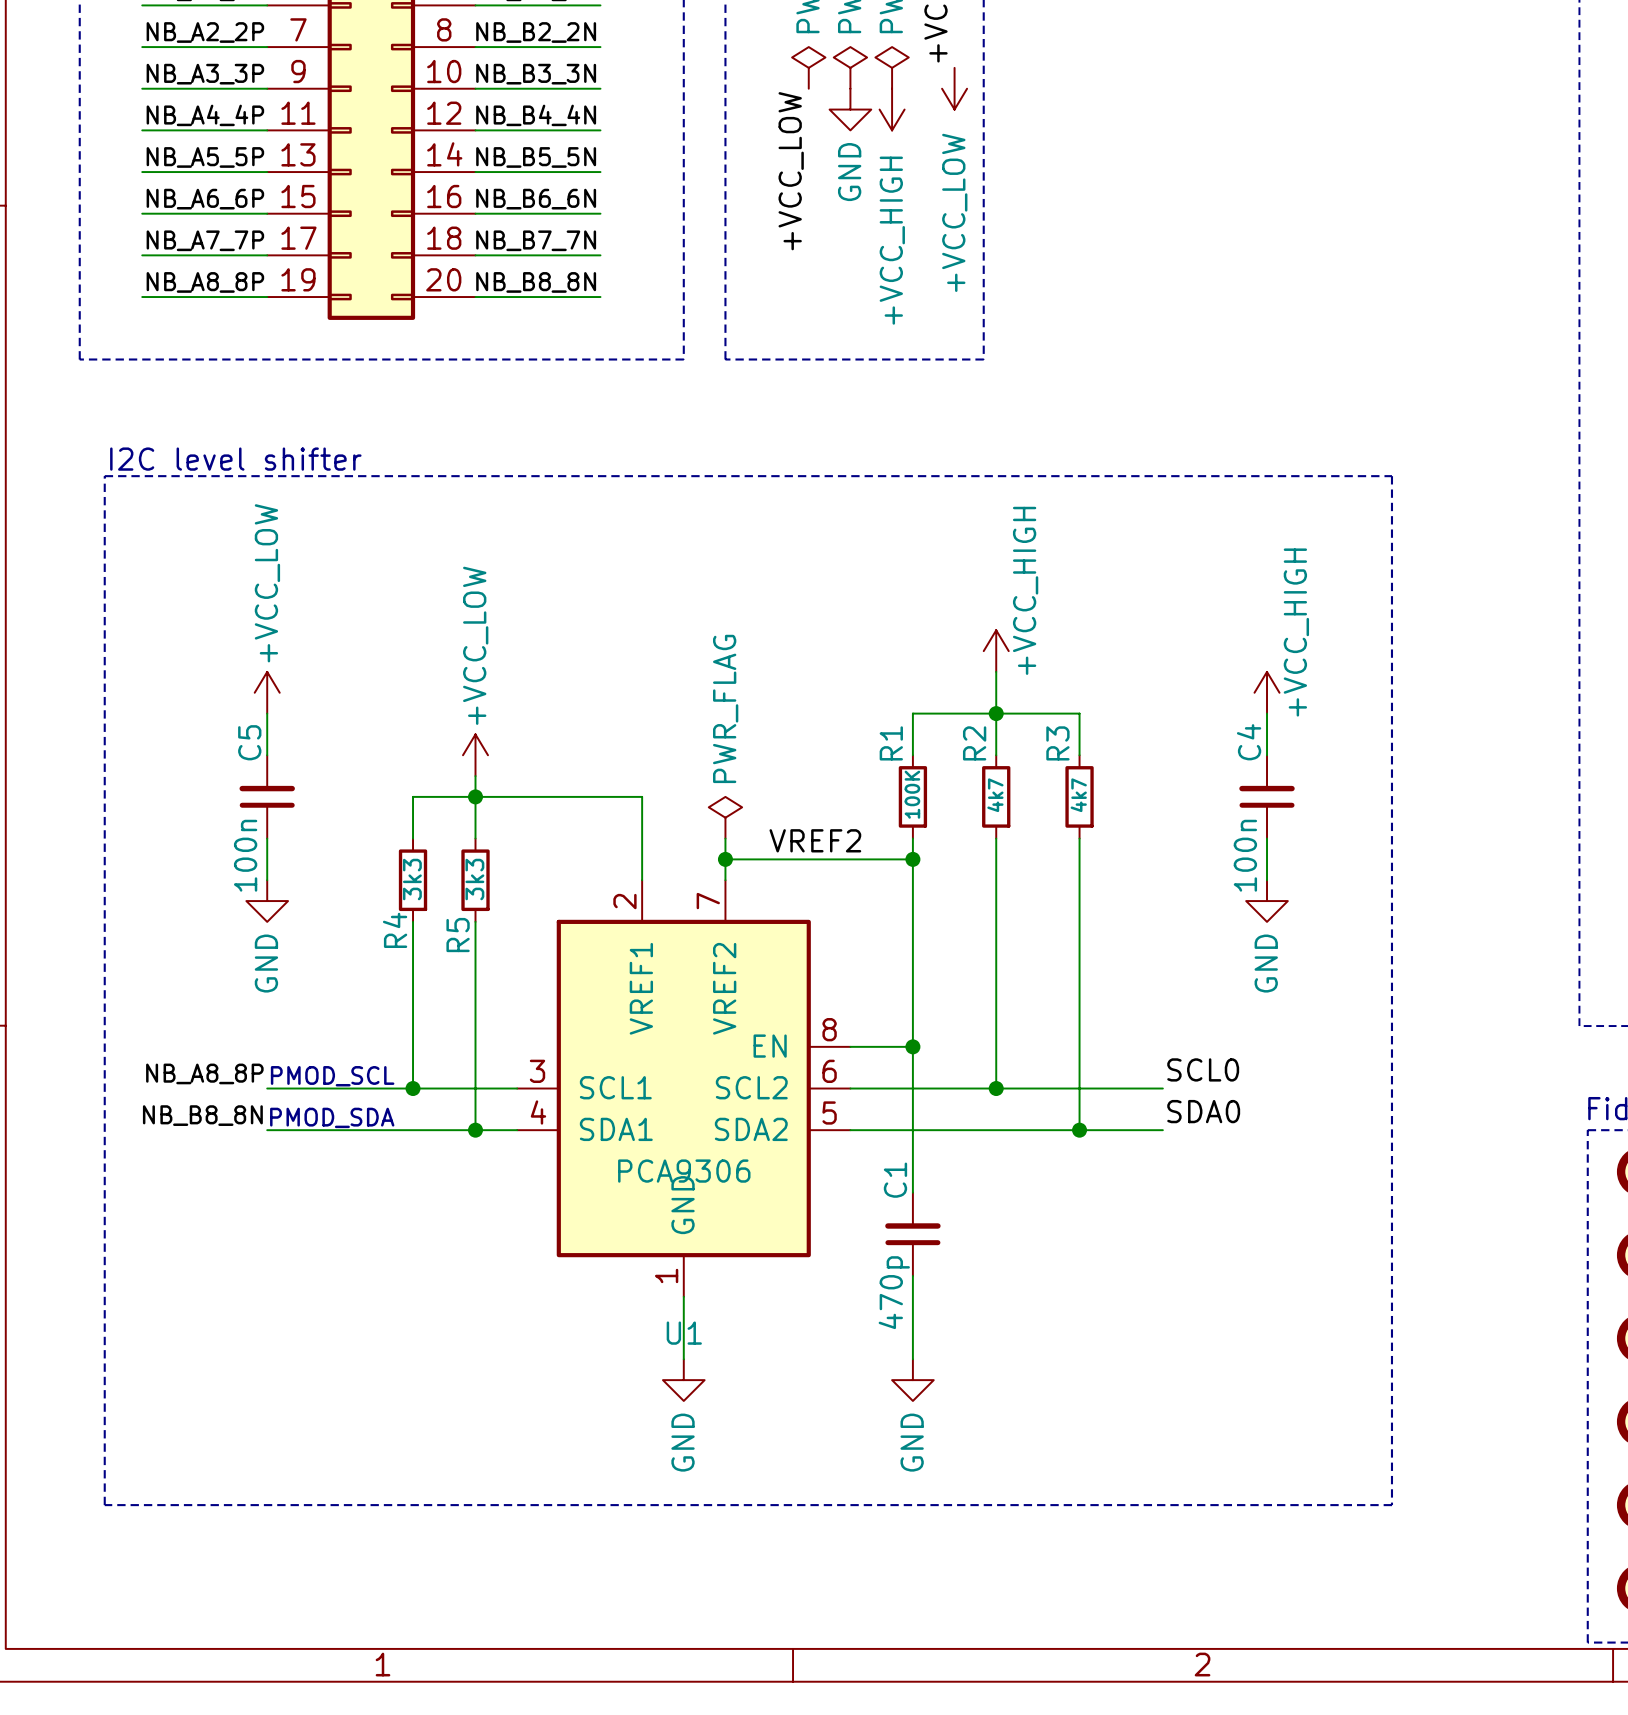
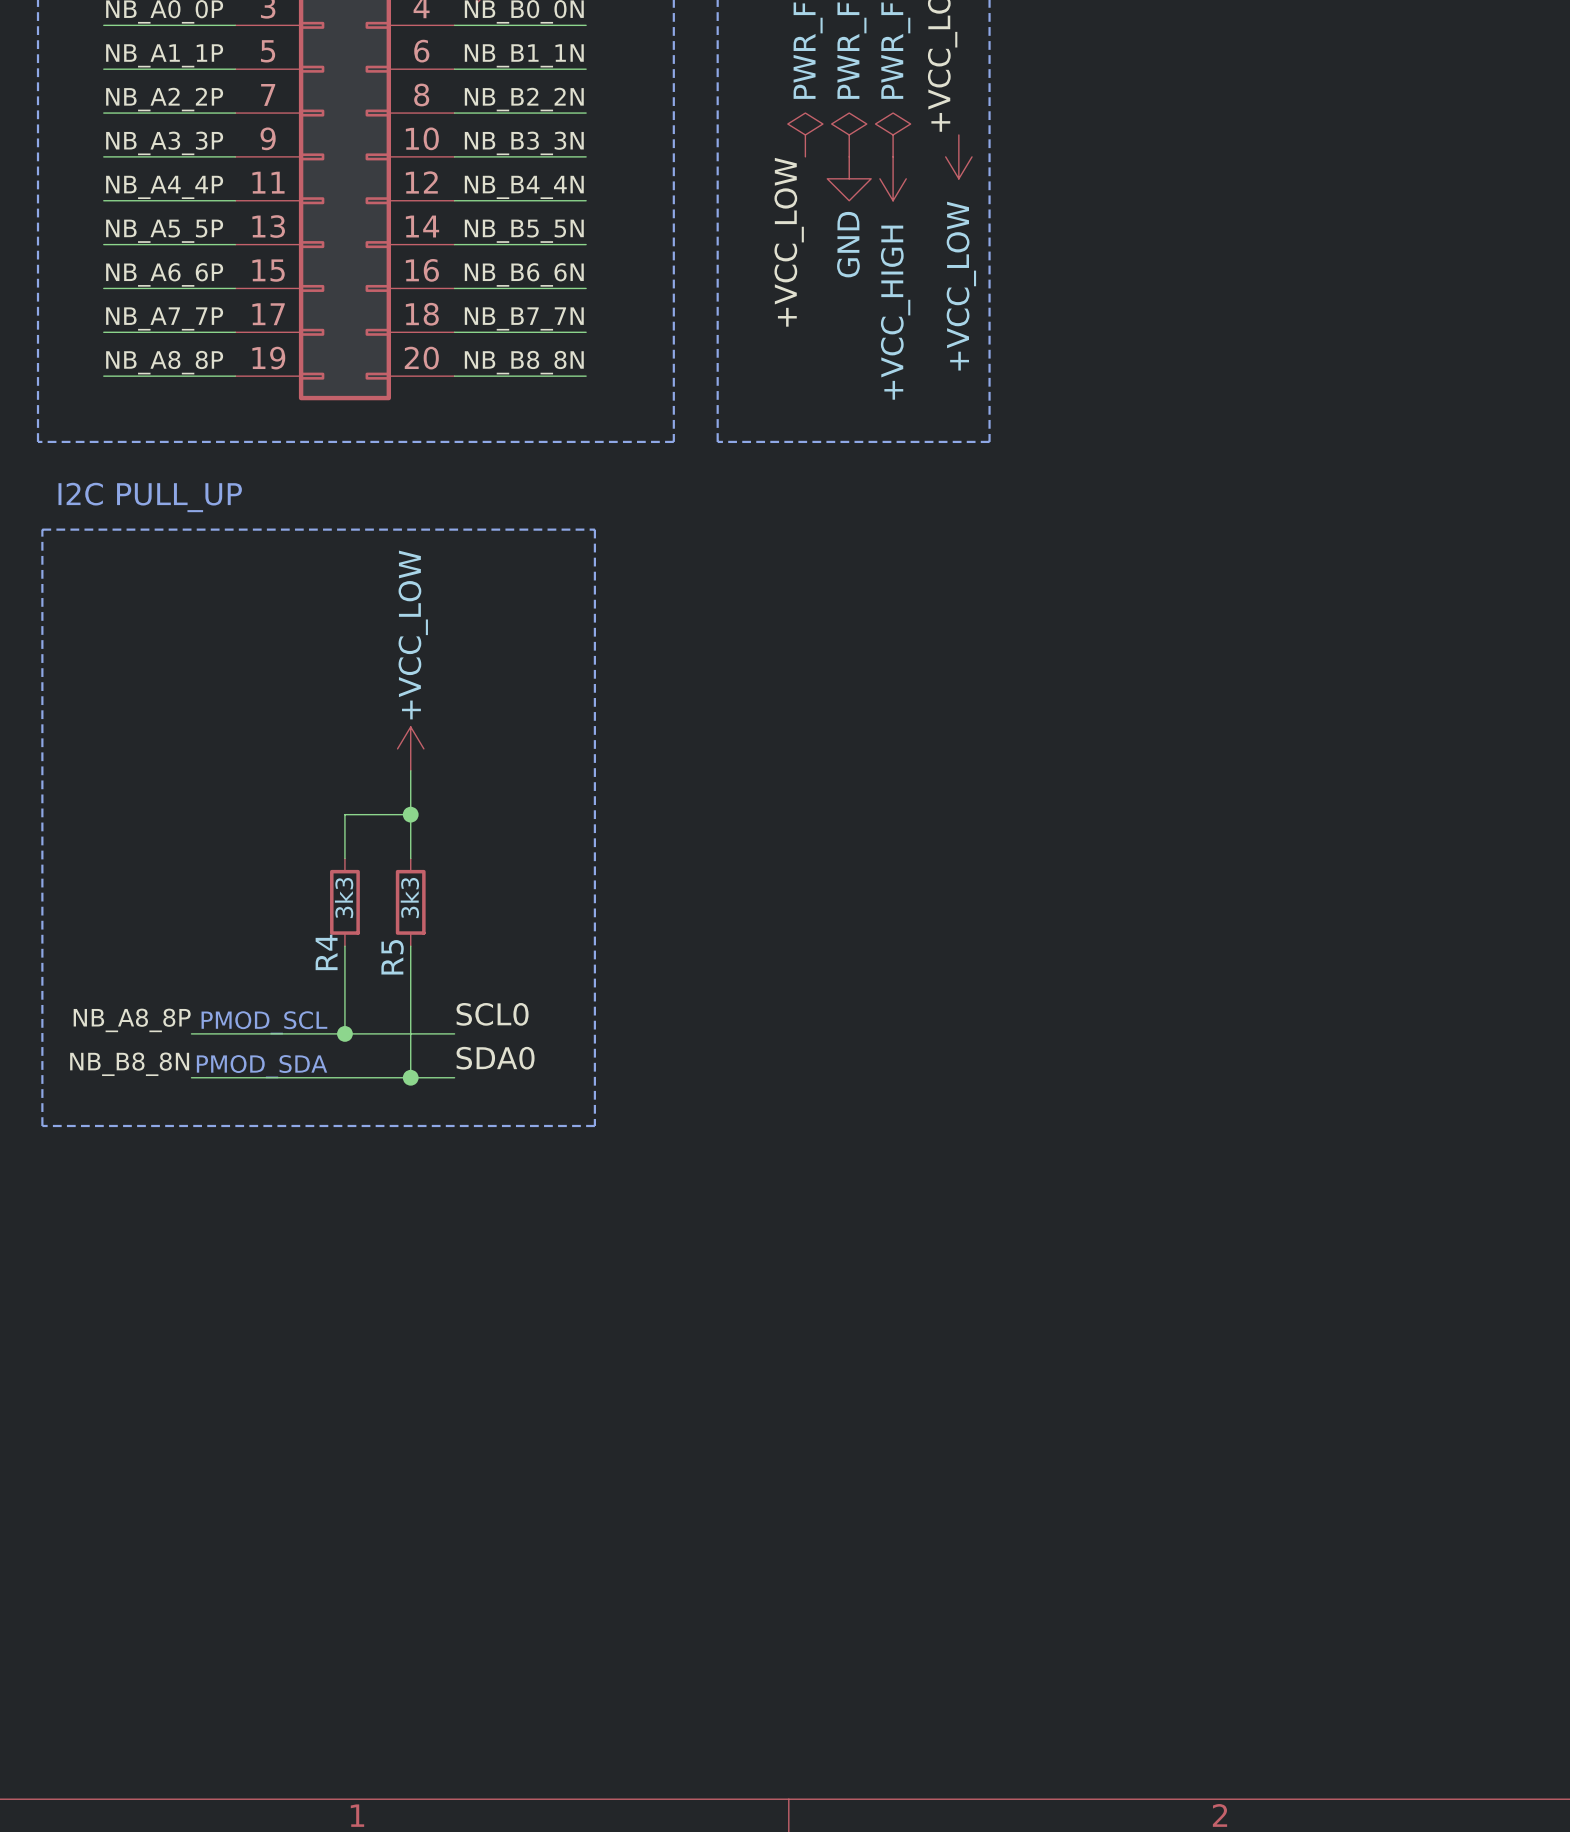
text: none -> I2C PULL_UP (150, 497)
line: none -> (42, 529) (594, 529) (594, 1125) (42, 1125) (42, 529)
text: I2C level shifter (235, 459) -> none
line: (104, 476) (1391, 476) (1391, 1505) (104, 1505) (104, 476) -> none
power symbol: none -> +VCC_LOW (410, 748)
power symbol: +VCC_HIGH (996, 651) -> none
wire: none -> (410, 770) (410, 858)
wire: (996, 671) (996, 755) -> none
power symbol: +VCC_LOW (267, 692) -> none
power symbol: +VCC_HIGH (1267, 692) -> none
wire: (267, 713) (267, 755) -> none
wire: none -> (410, 814) (344, 814) (344, 858)
junction: none -> (410, 814)
junction: (996, 713) -> none
wire: (1267, 713) (1267, 755) -> none
power symbol: +VCC_LOW (475, 755) -> none
wire: (912, 755) (912, 713) (1079, 713) (1079, 755) -> none
wire: (475, 776) (475, 838) -> none
C5: 100n (267, 796) -> none
junction: (475, 796) -> none
R1: 100K (912, 796) -> none
R2: 4k7 (996, 796) -> none
R3: 4k7 (1079, 796) -> none
C4: 100n (1267, 796) -> none
power symbol: PWR_FLAG (725, 817) -> none
wire: (267, 838) (267, 880) -> none
wire: none -> (344, 946) (344, 1033)
wire: (413, 838) (413, 796) (642, 796) (642, 880) -> none
wire: none -> (410, 946) (410, 1077)
wire: (725, 838) (725, 880) -> none
wire: (912, 838) (912, 1192) -> none
wire: (996, 838) (996, 1088) -> none
wire: (1079, 838) (1079, 1130) -> none
wire: (1267, 838) (1267, 880) -> none
label: VREF2 (815, 840) -> none
wire: (725, 859) (912, 859) -> none
junction: (725, 859) -> none
junction: (912, 859) -> none
R4 position: (413, 880) -> (344, 902)
R5 position: (475, 880) -> (410, 902)
power symbol: GND (267, 901) -> none
power symbol: GND (1267, 901) -> none
label: none -> SCL0 (492, 1014)
junction: none -> (344, 1033)
wire: (413, 921) (413, 1088) -> none
wire: (475, 921) (475, 1130) -> (454, 1033) (191, 1033)
label: none -> SDA0 (495, 1058)
junction: none -> (410, 1077)
wire: (850, 1046) (912, 1046) -> none
junction: (912, 1046) -> none
label: SCL0 (1203, 1069) -> none
label position: NB_A8_8P (204, 1073) -> NB_A8_8P (132, 1020)
text position: PMOD_SCL (332, 1076) -> PMOD_SCL (264, 1022)
wire: (267, 1088) (517, 1088) -> none
junction: (413, 1088) -> none
U1: PCA9306 (683, 1088) -> none
wire: (850, 1088) (1162, 1088) -> none
junction: (996, 1088) -> none
label: SDA0 (1203, 1111) -> none
label position: NB_B8_8N (202, 1115) -> NB_B8_8N (129, 1064)
text position: PMOD_SDA (332, 1117) -> PMOD_SDA (262, 1066)
wire: (267, 1130) (517, 1130) -> (191, 1077) (454, 1077)
junction: (475, 1130) -> none
wire: (850, 1130) (1162, 1130) -> none
junction: (1079, 1130) -> none
C1: 470p (912, 1234) -> none
wire: (912, 1275) (912, 1359) -> none
wire: (683, 1296) (683, 1359) -> none
power symbol: GND (683, 1380) -> none
power symbol: GND (912, 1380) -> none

